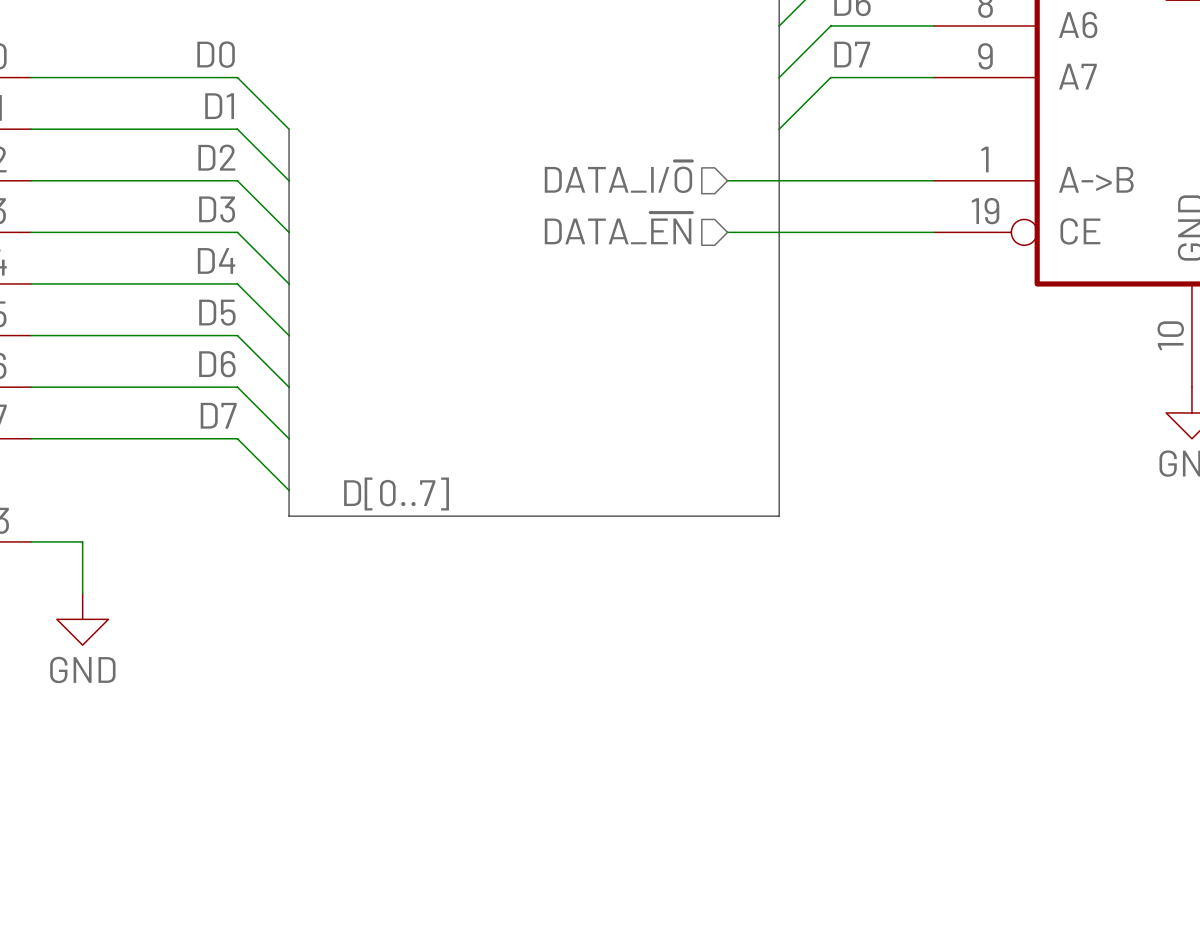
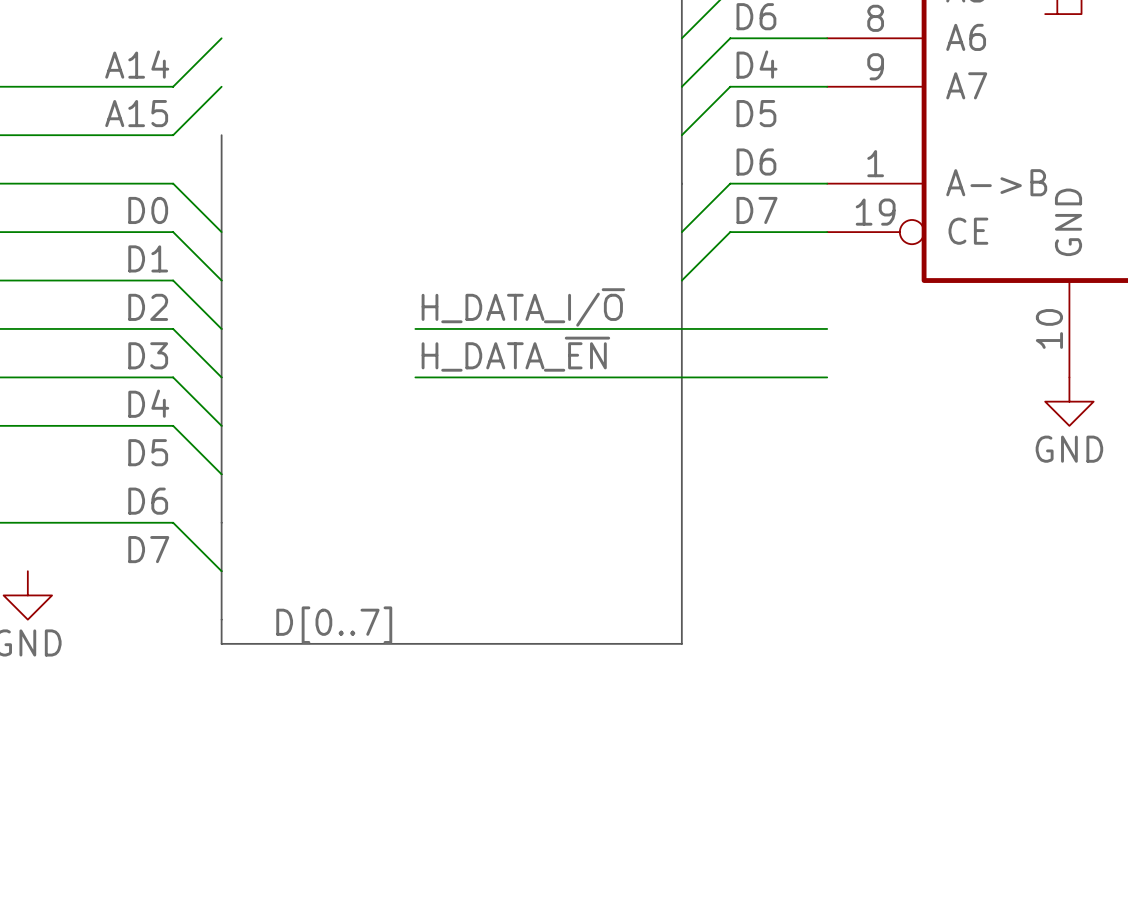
label: D0 (216, 54) -> A14 (137, 64)
label: D7 (852, 54) -> D4 (757, 64)
wire: (237, 77) (289, 129) -> (173, 86) (221, 38)
label: D1 (219, 106) -> A15 (136, 113)
label: none -> D5 (756, 113)
wire: (237, 129) (289, 180) -> (173, 135) (221, 86)
label: D2 (216, 157) -> none
label: none -> D6 (756, 162)
hierarchical label: DATA_I/~{O} (618, 176) -> none
wire: (727, 180) (830, 180) -> (681, 232) (730, 183)
label: D3 (217, 209) -> D0 (148, 210)
label: none -> D7 (757, 210)
hierarchical label: DATA_~{EN} (618, 228) -> none
wire: (727, 232) (830, 232) -> (681, 280) (730, 232)
label: D4 (216, 260) -> D1 (148, 258)
label: none -> H_DATA_I/~{O} (523, 307)
label: D5 (217, 312) -> D2 (148, 307)
wire: none -> (415, 328) (827, 328)
label: none -> H_DATA_~{EN} (515, 354)
label: D6 (217, 364) -> D3 (148, 355)
wire: none -> (415, 377) (827, 377)
label: D7 (218, 415) -> D4 (148, 403)
label: none -> D5 (148, 452)
label position: D[0..7] (396, 494) -> D[0..7] (334, 625)
bus: (289, 516) (779, 516) -> (221, 498) (221, 643) (681, 643) (681, 498)
label: none -> D6 (148, 501)
wire: (82, 541) (82, 593) -> (27, 522) (173, 522) (221, 571)
label: none -> D7 (148, 549)

